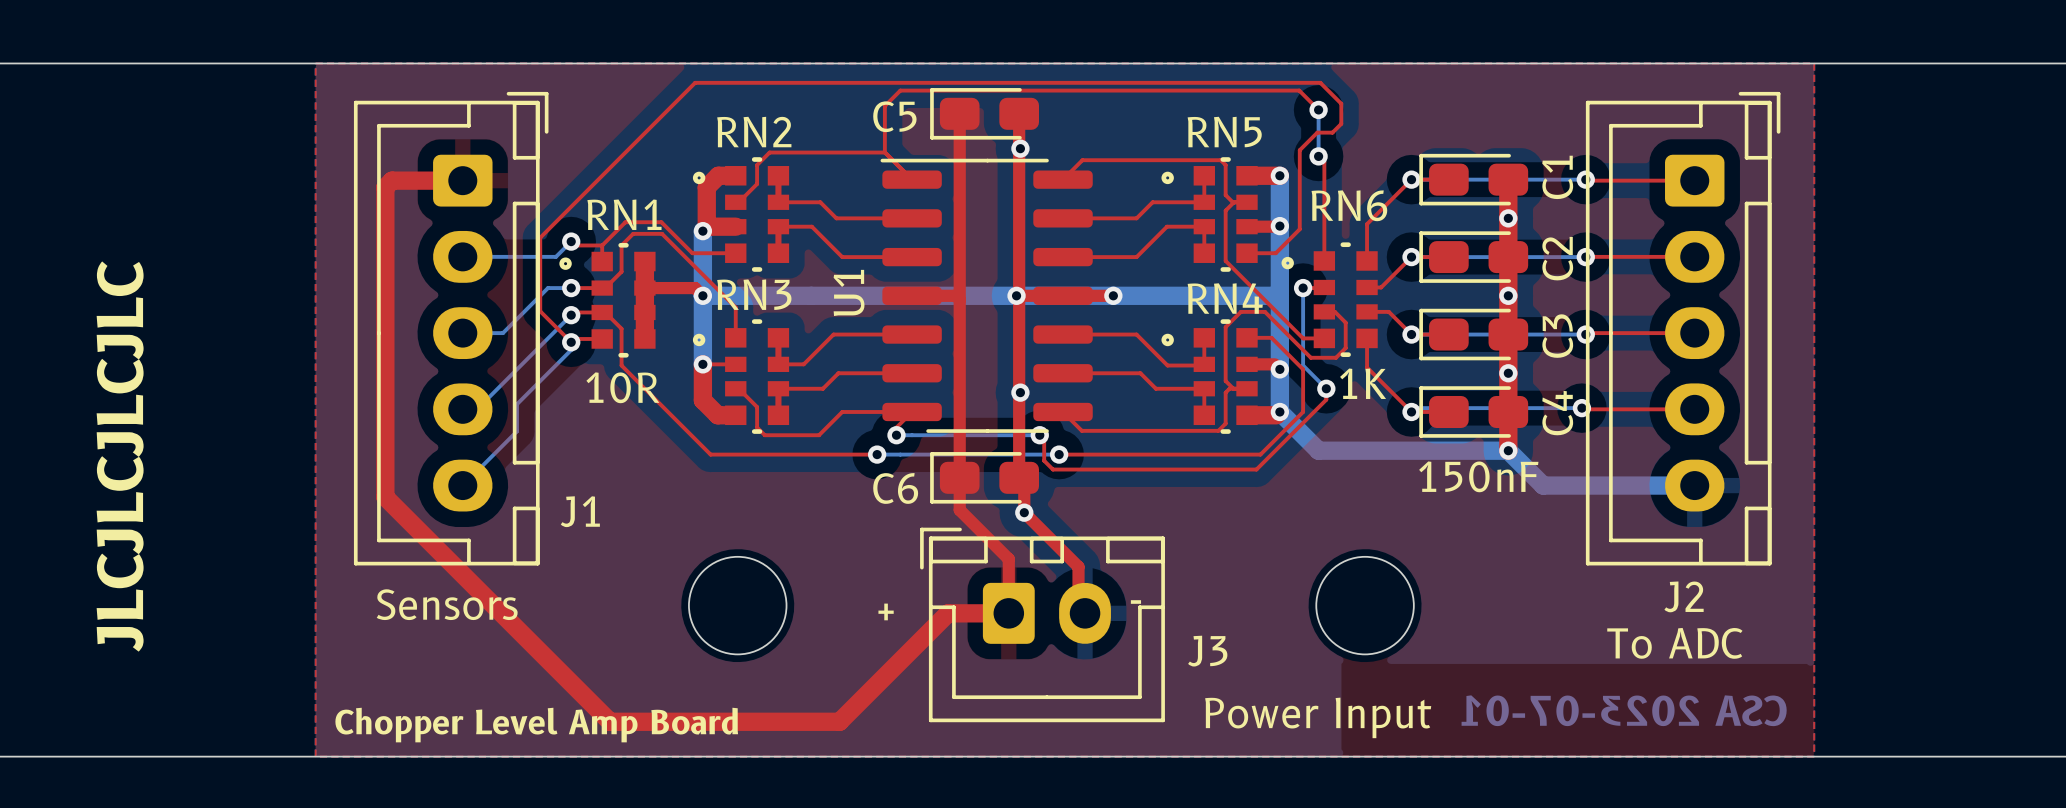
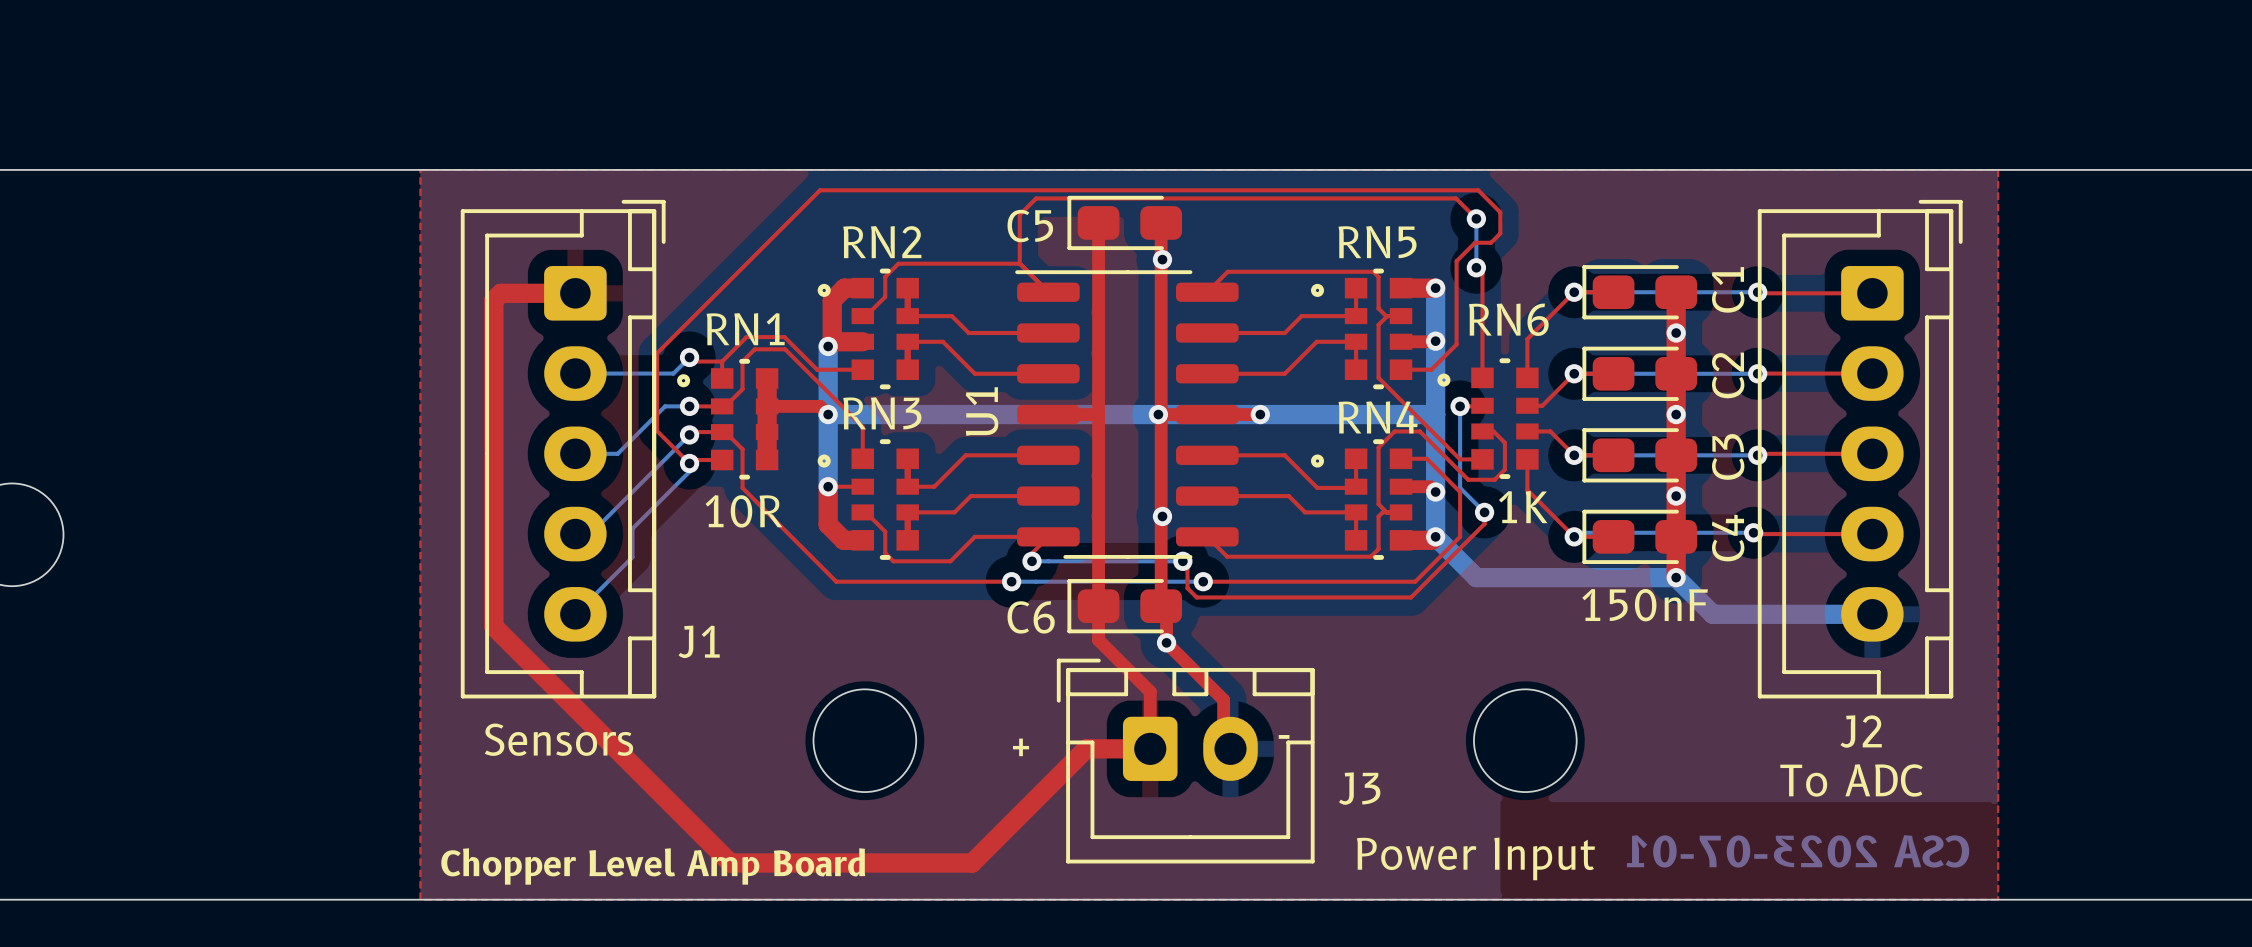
text: JLCJLCJLCJLC (120, 456) -> none

